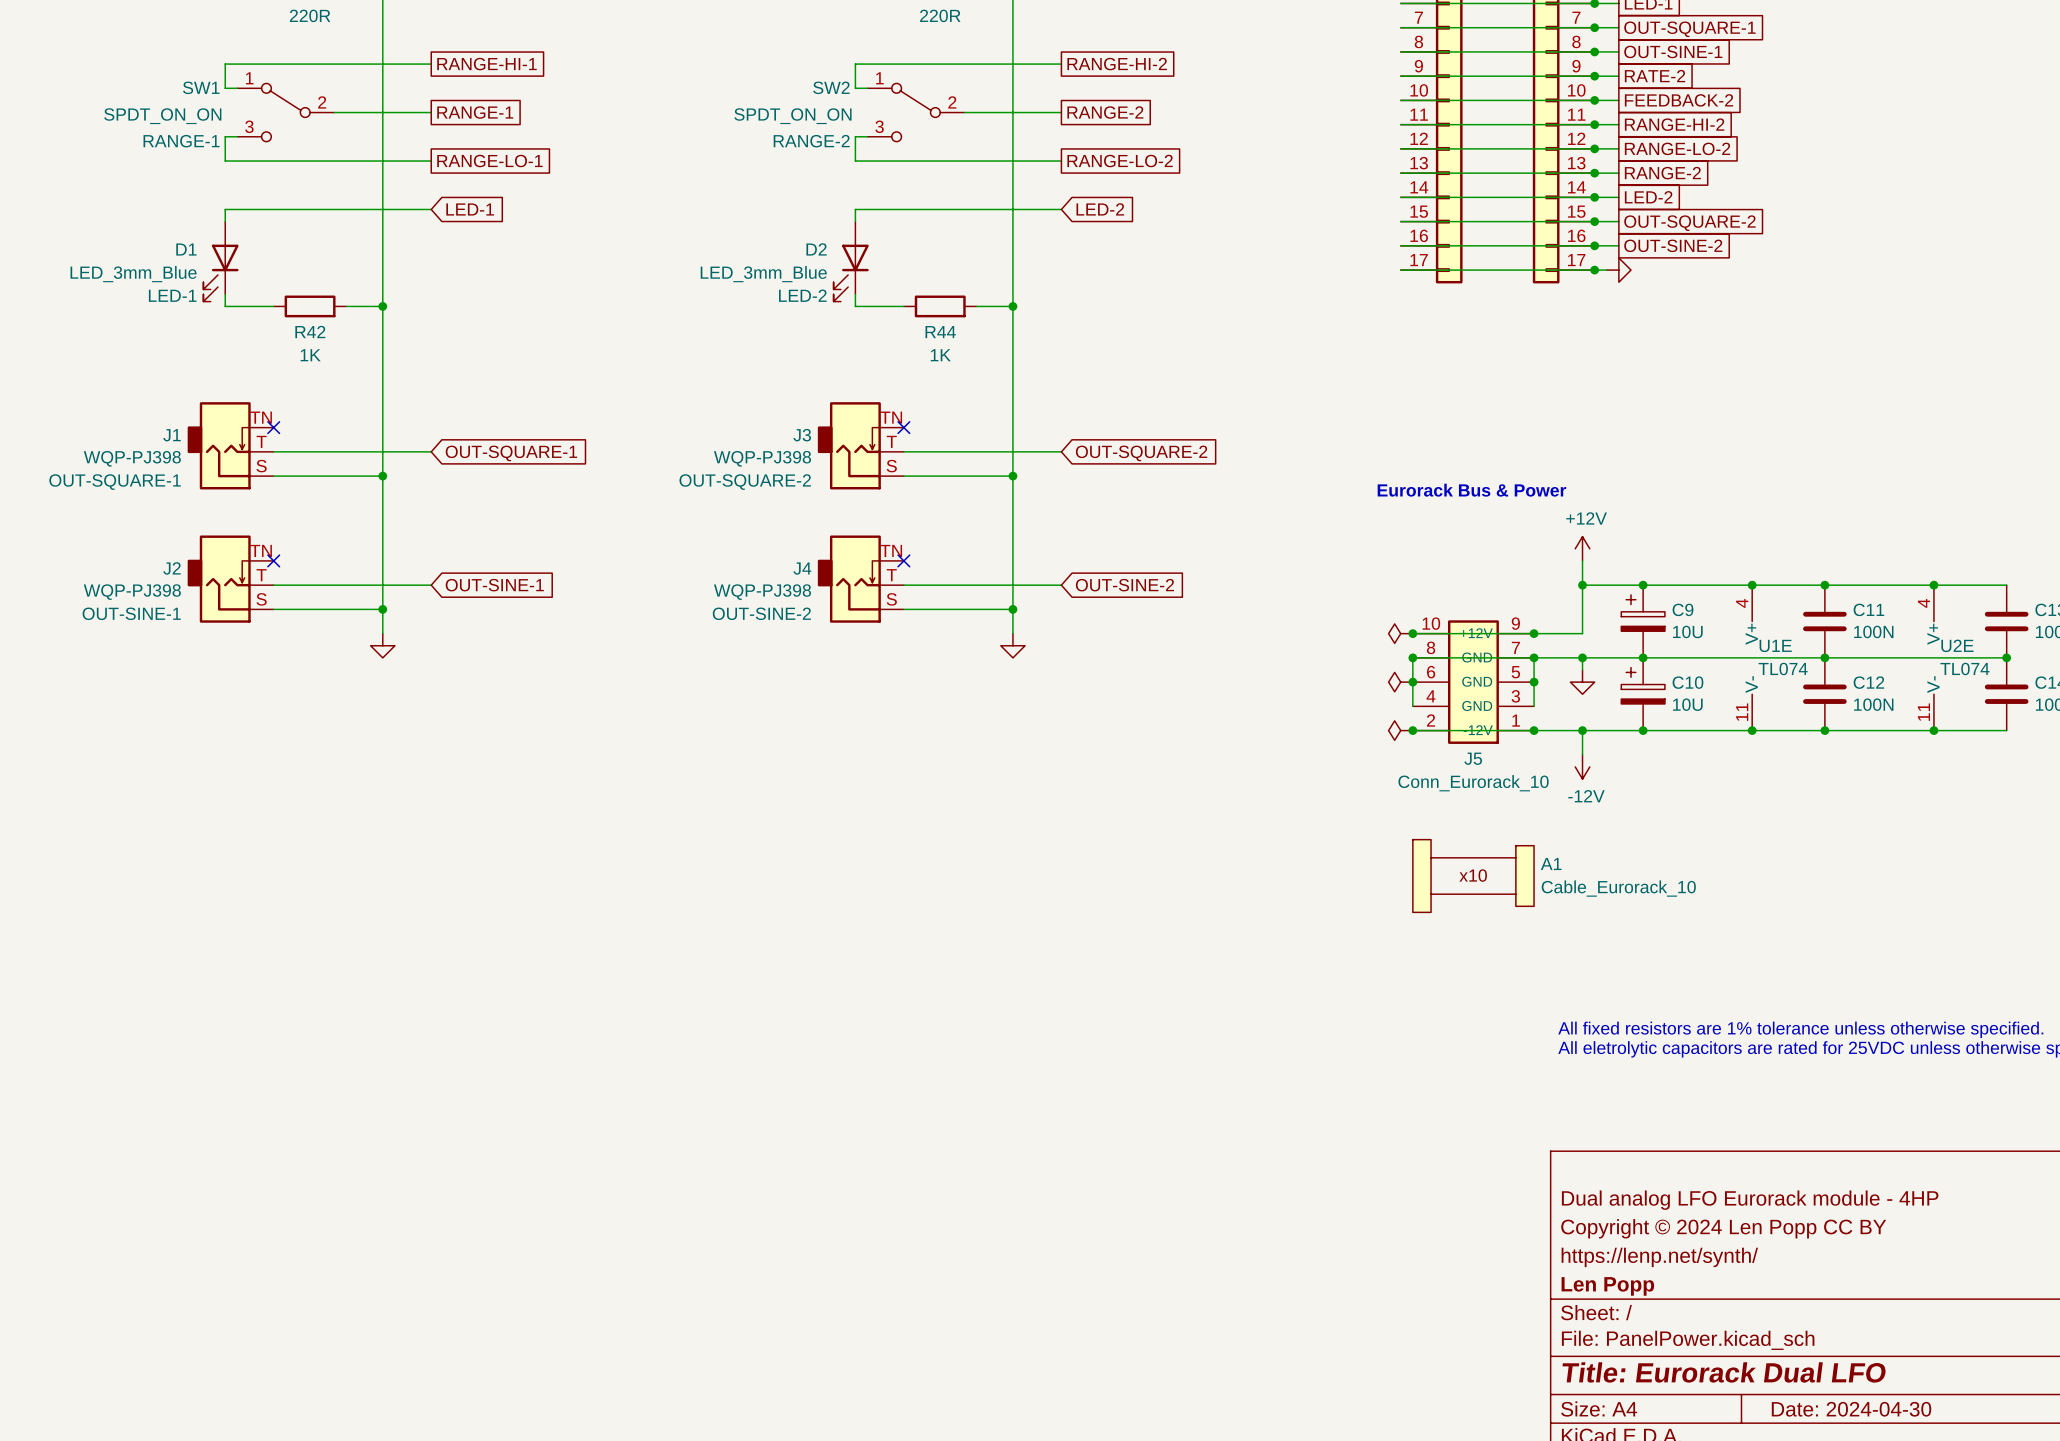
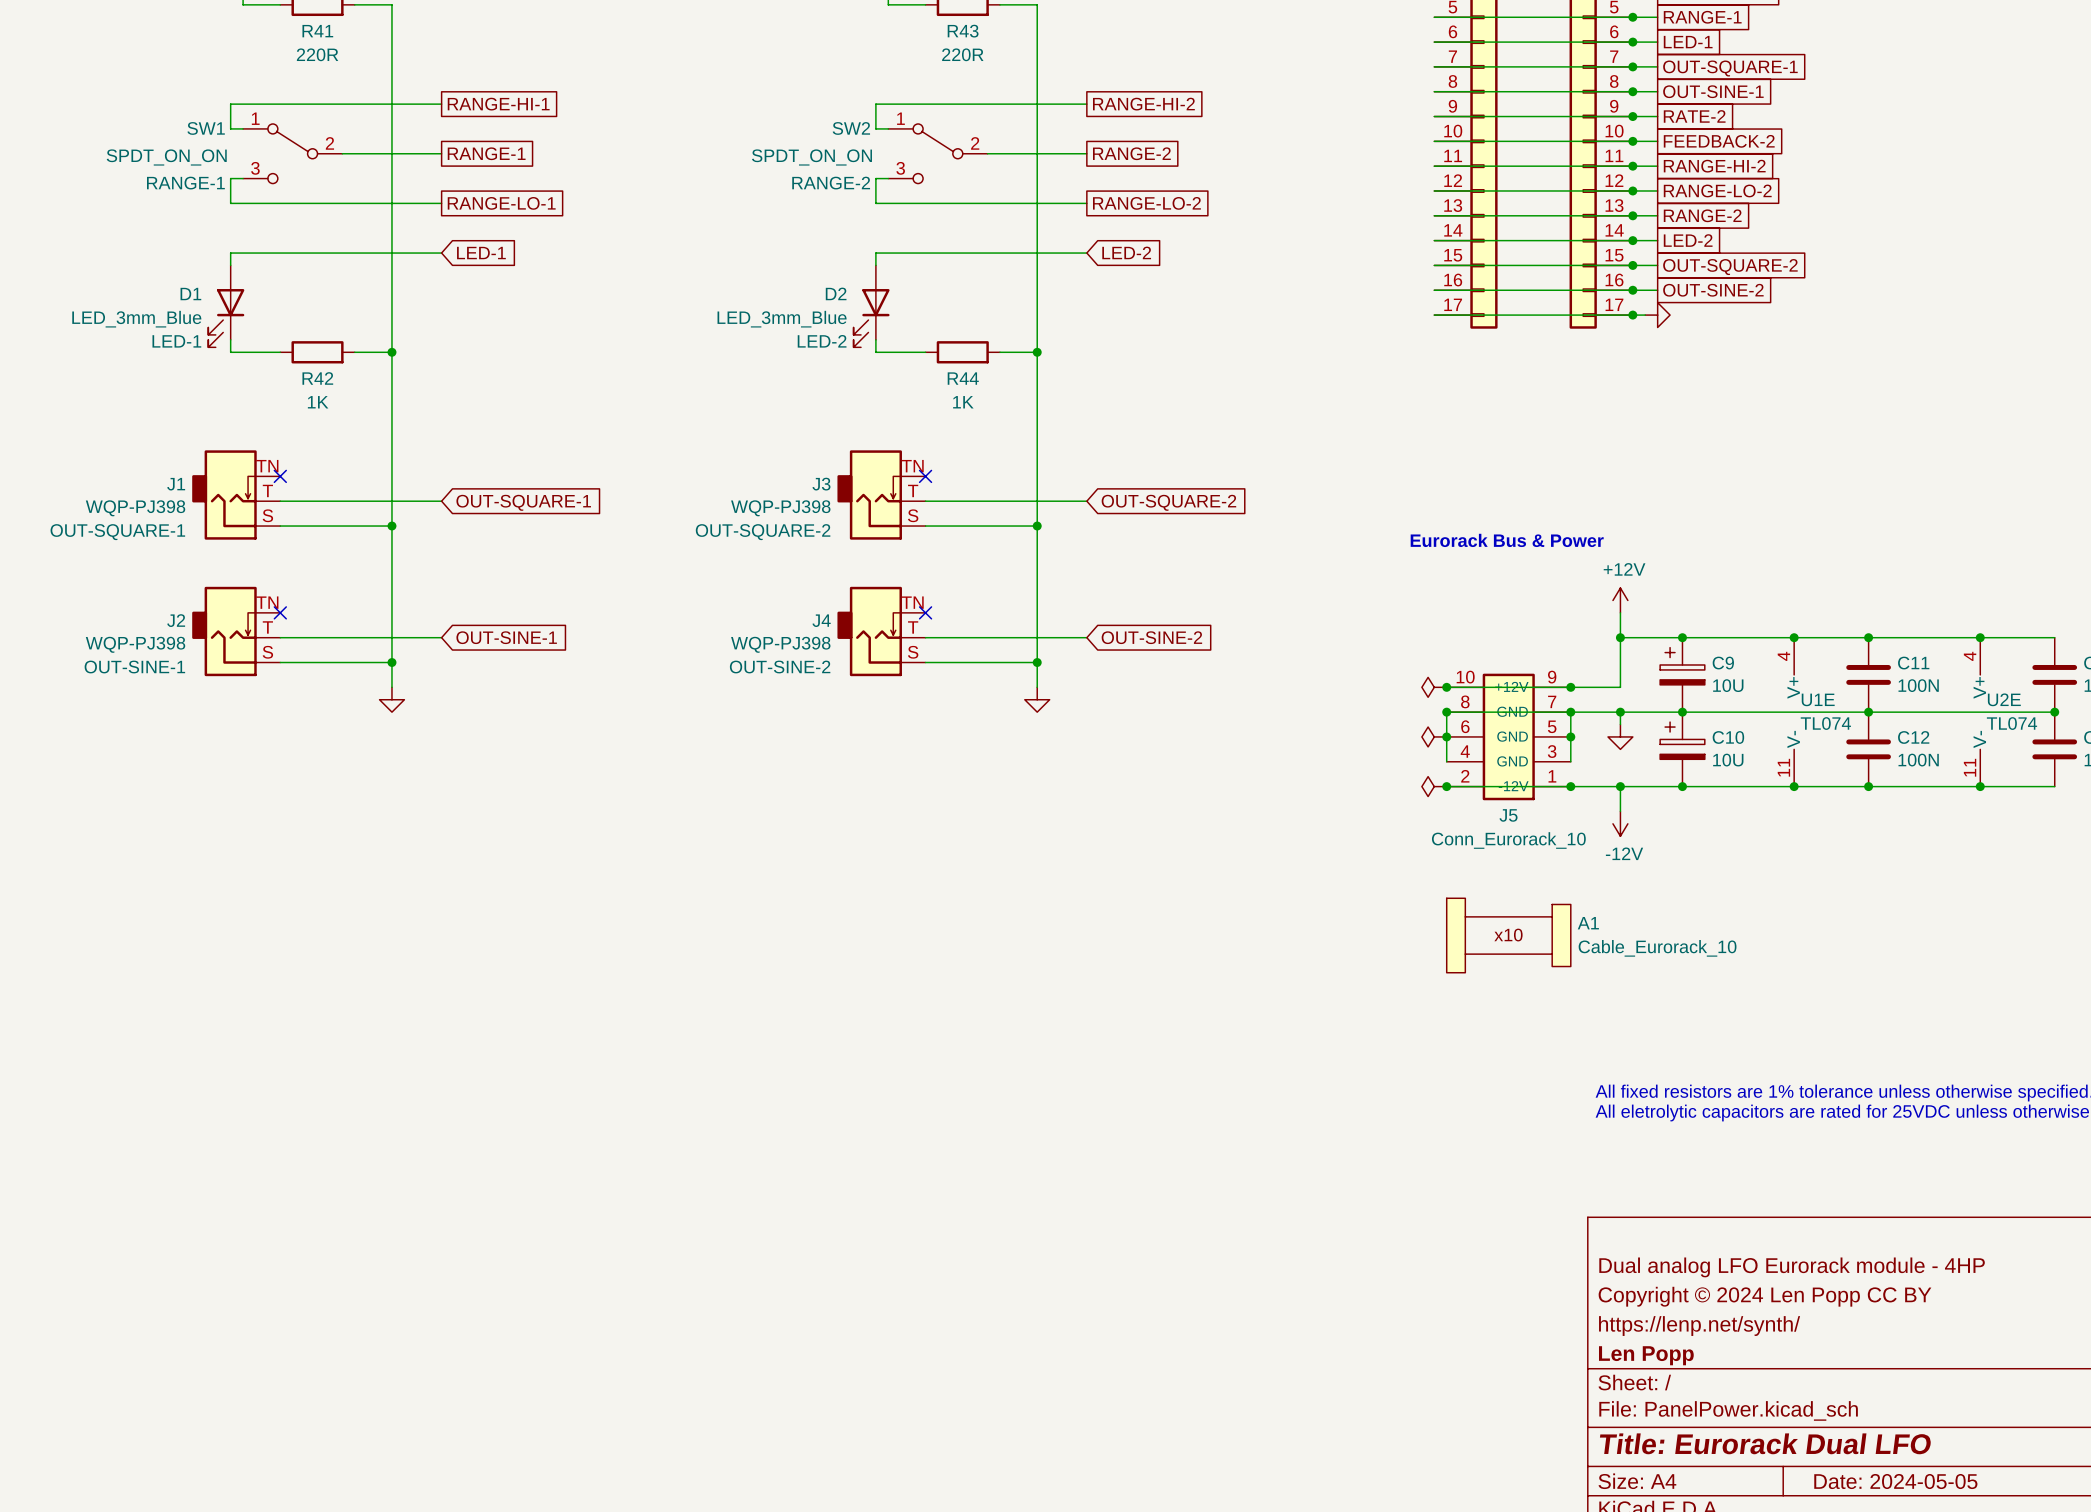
title block: Date: 2024-04-30 (1851, 1409) -> Date: 2024-05-05 (1895, 1481)

